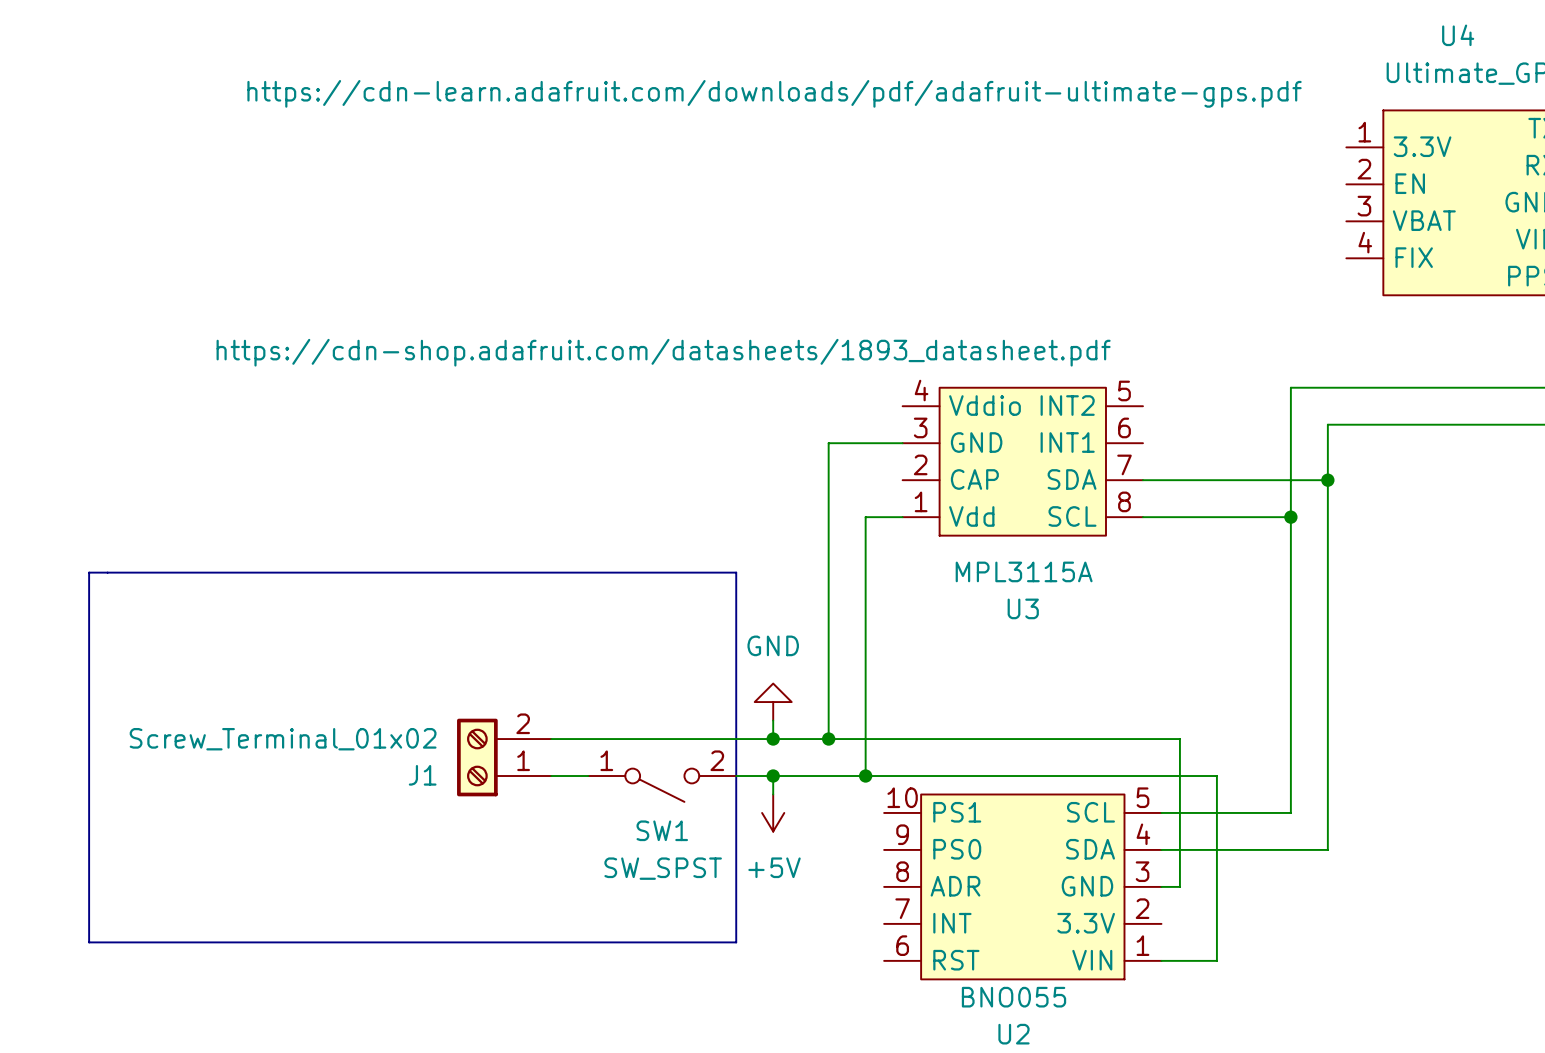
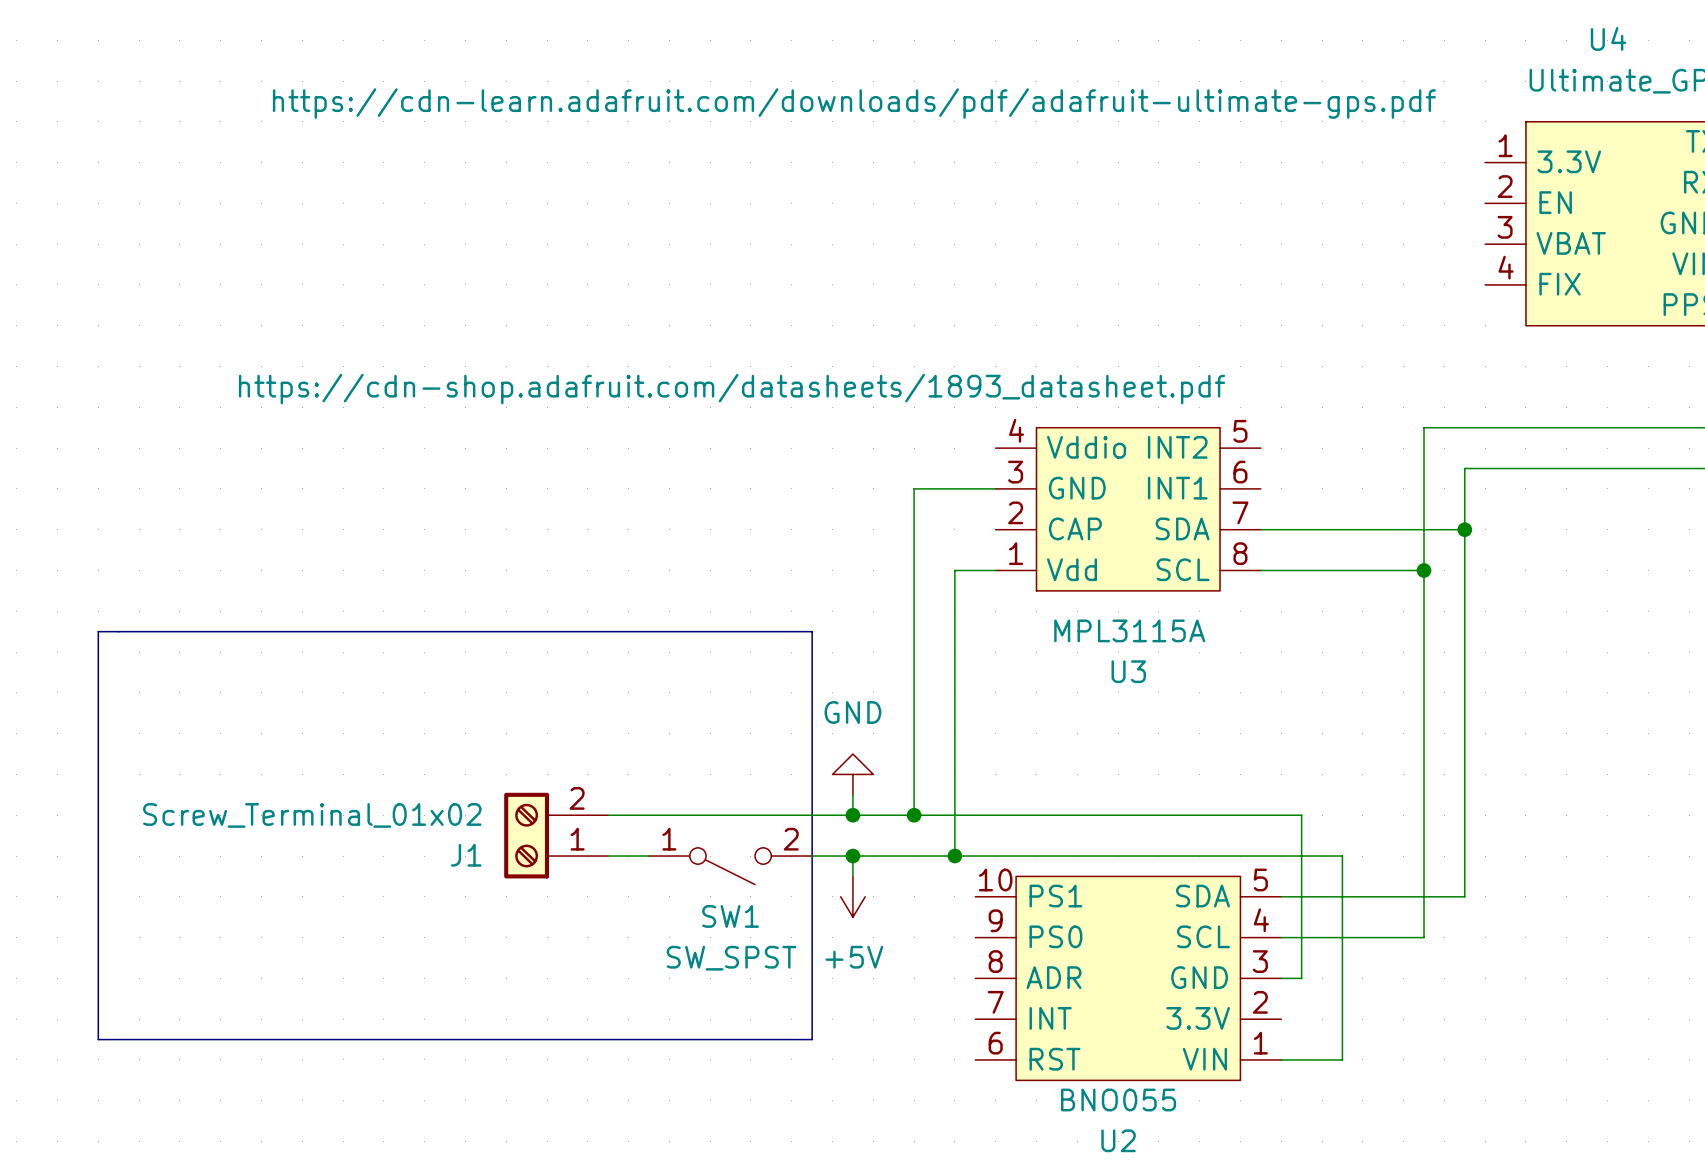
U2 pin name: SCL (1090, 812) -> SDA (1202, 896)
wire: (1327, 812) (1327, 849) (1290, 849) -> (1464, 896) (1424, 896) (1424, 937)
U2 pin name: SDA (1090, 849) -> SCL (1203, 936)

